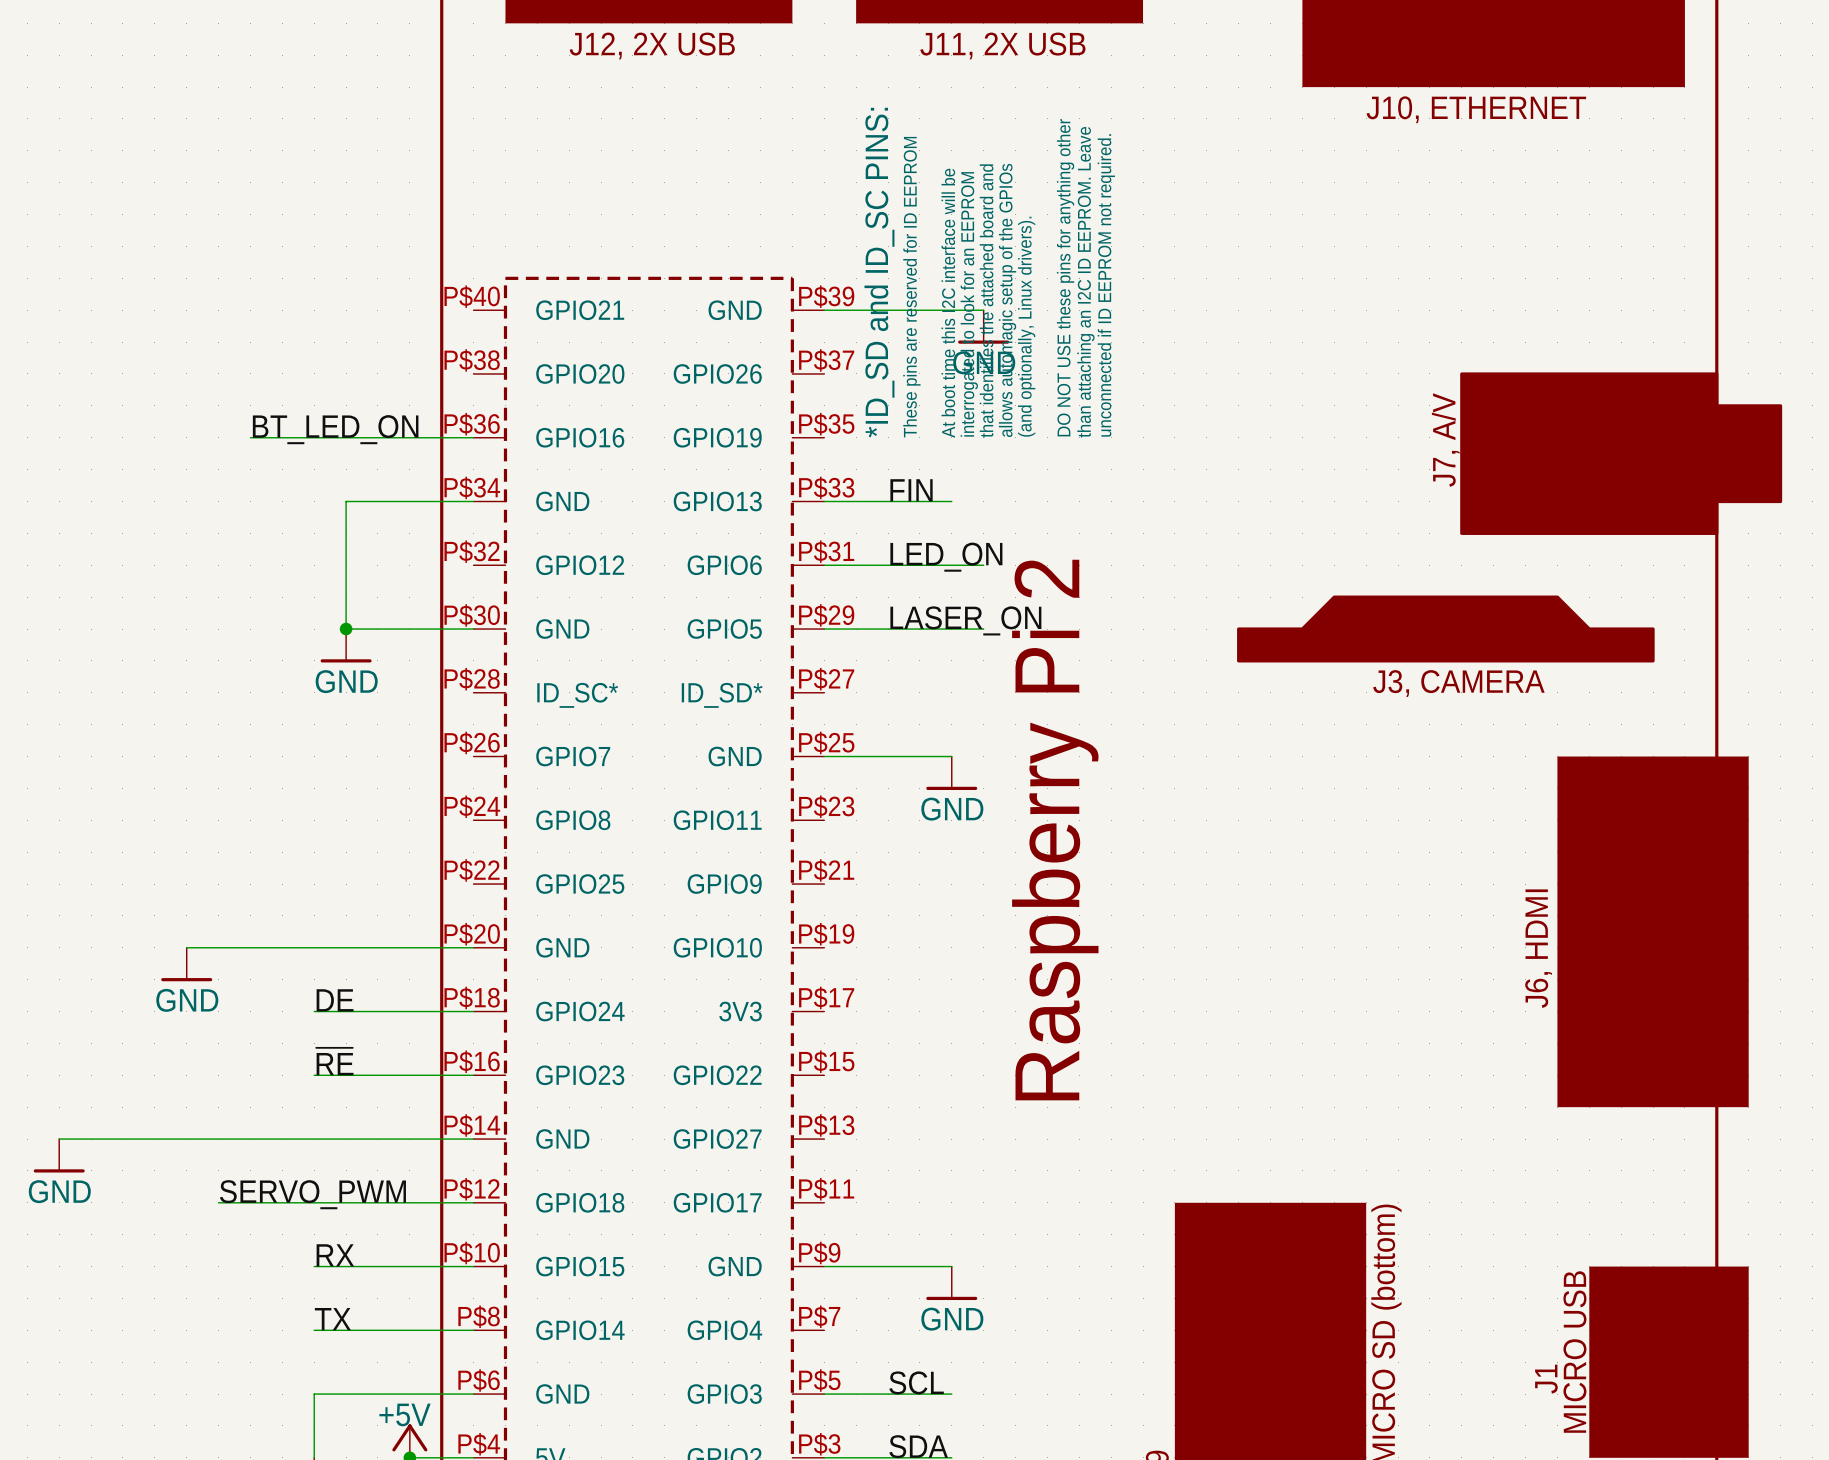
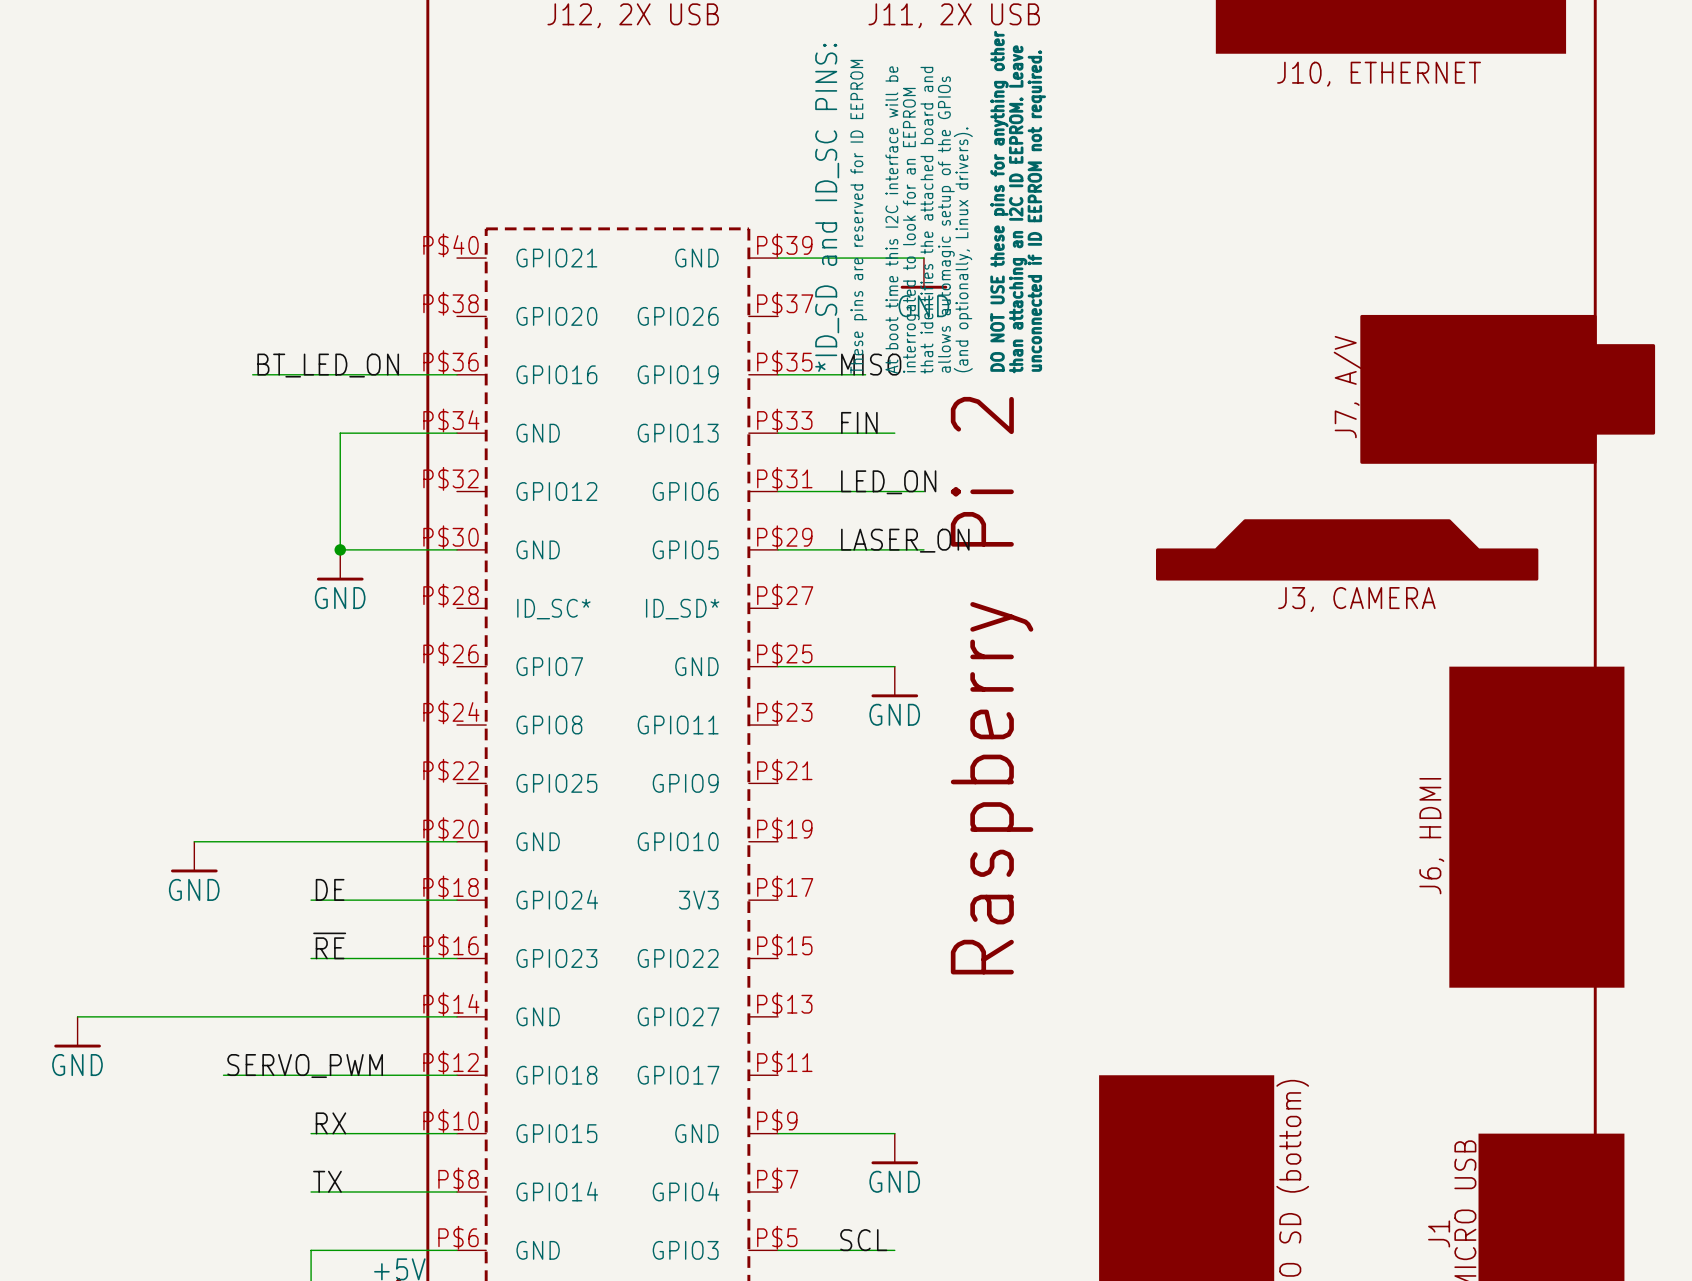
label: none -> MISO (871, 364)
wire: none -> (778, 374) (865, 374)

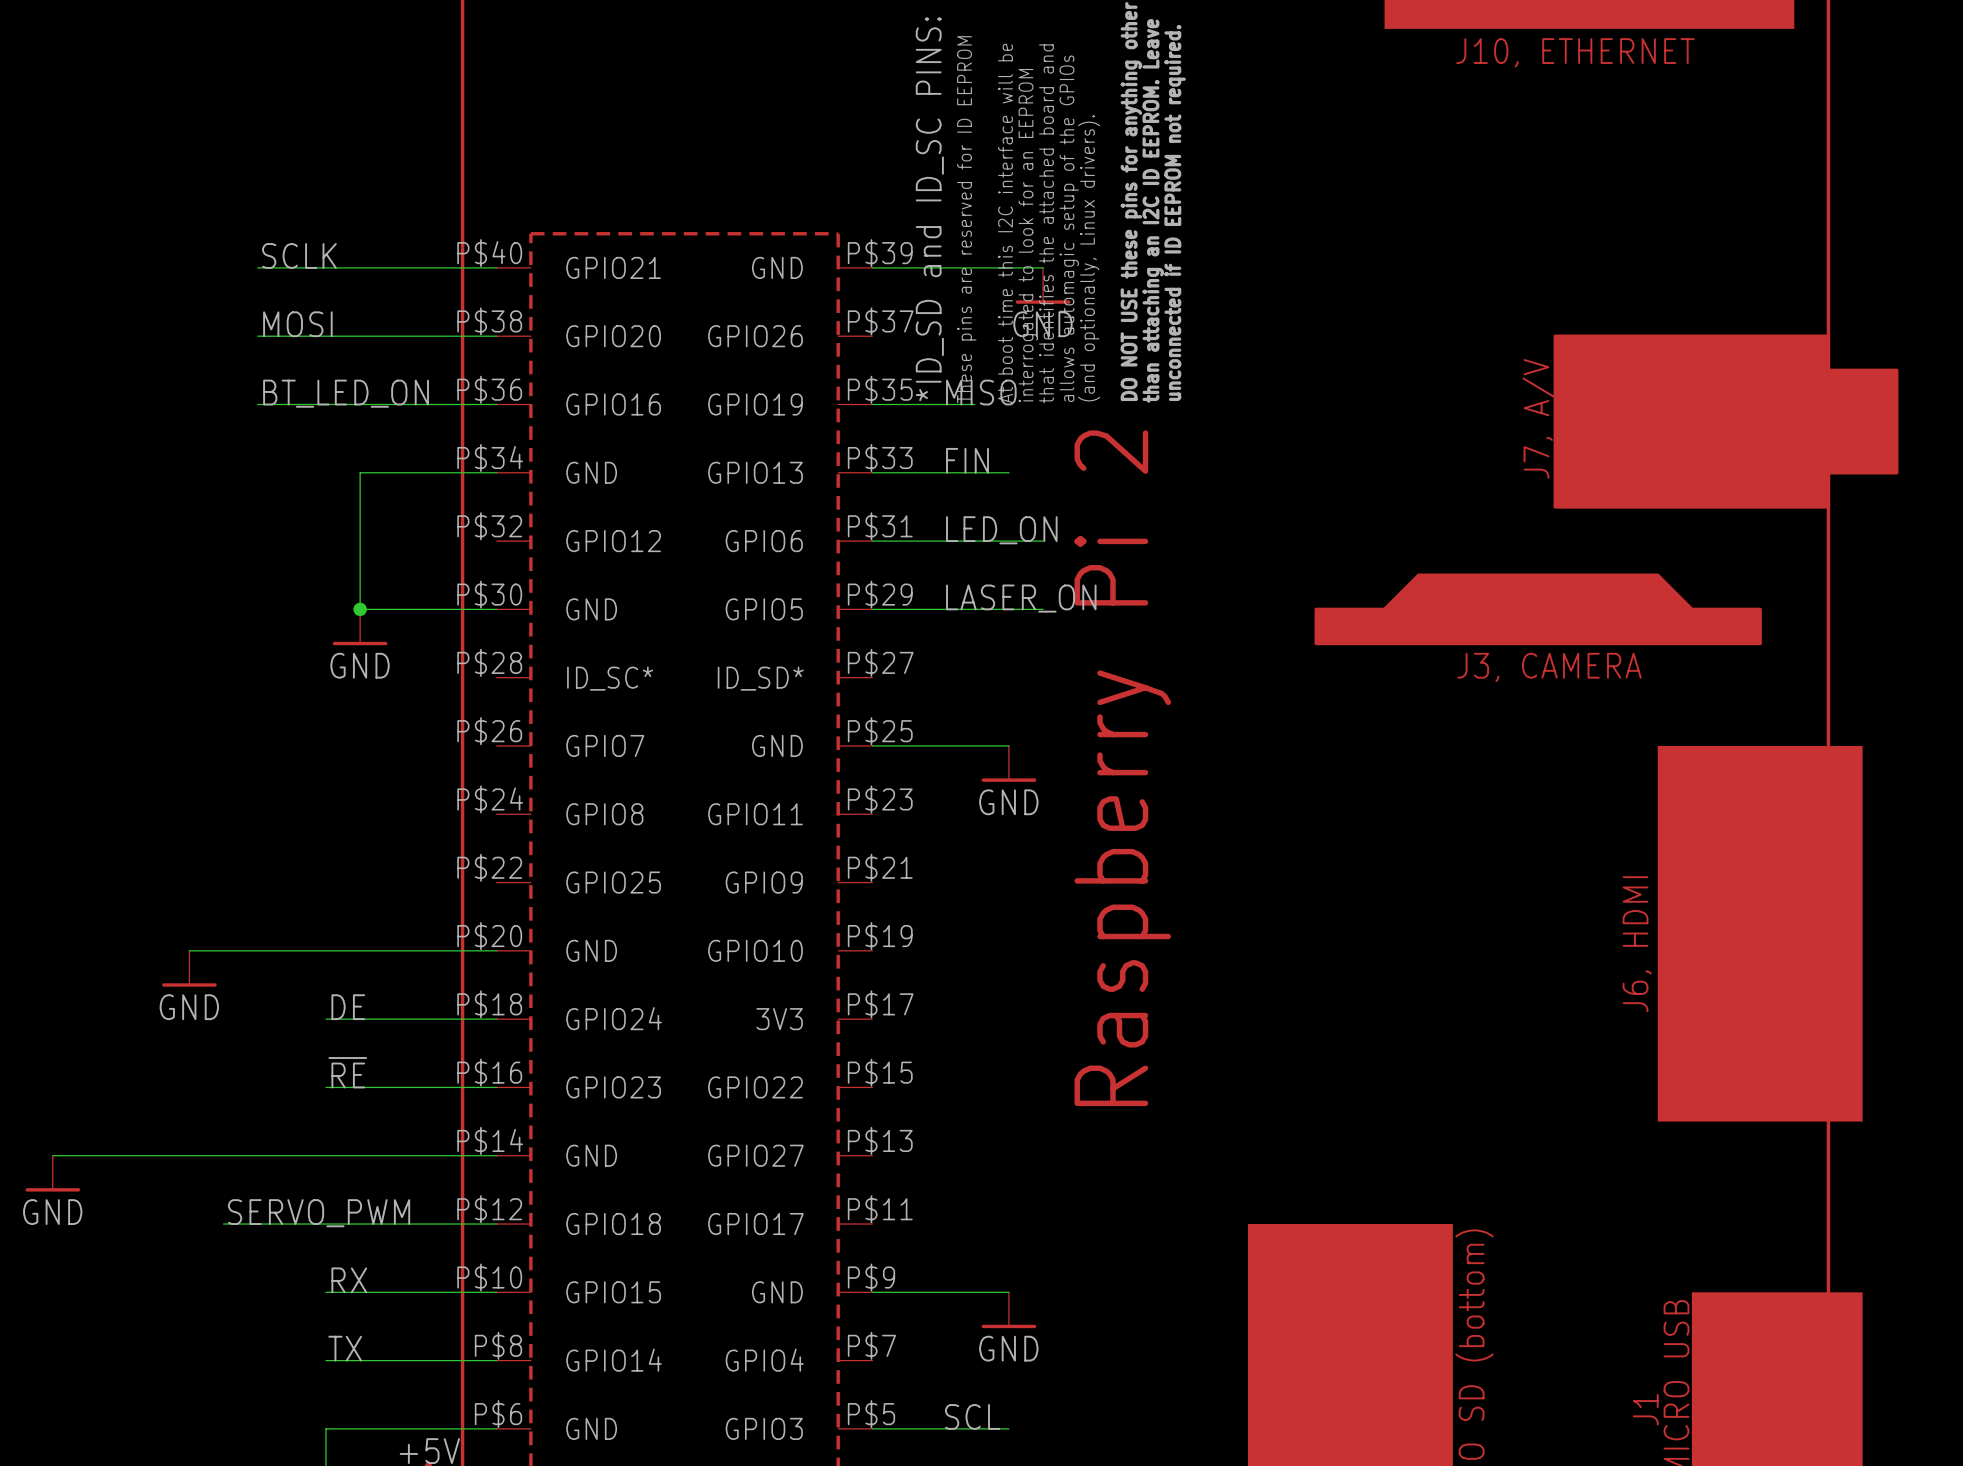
label: none -> SCLK (299, 255)
wire: none -> (257, 267) (496, 267)
label: none -> MOSI (297, 324)
wire: none -> (257, 336) (496, 336)

